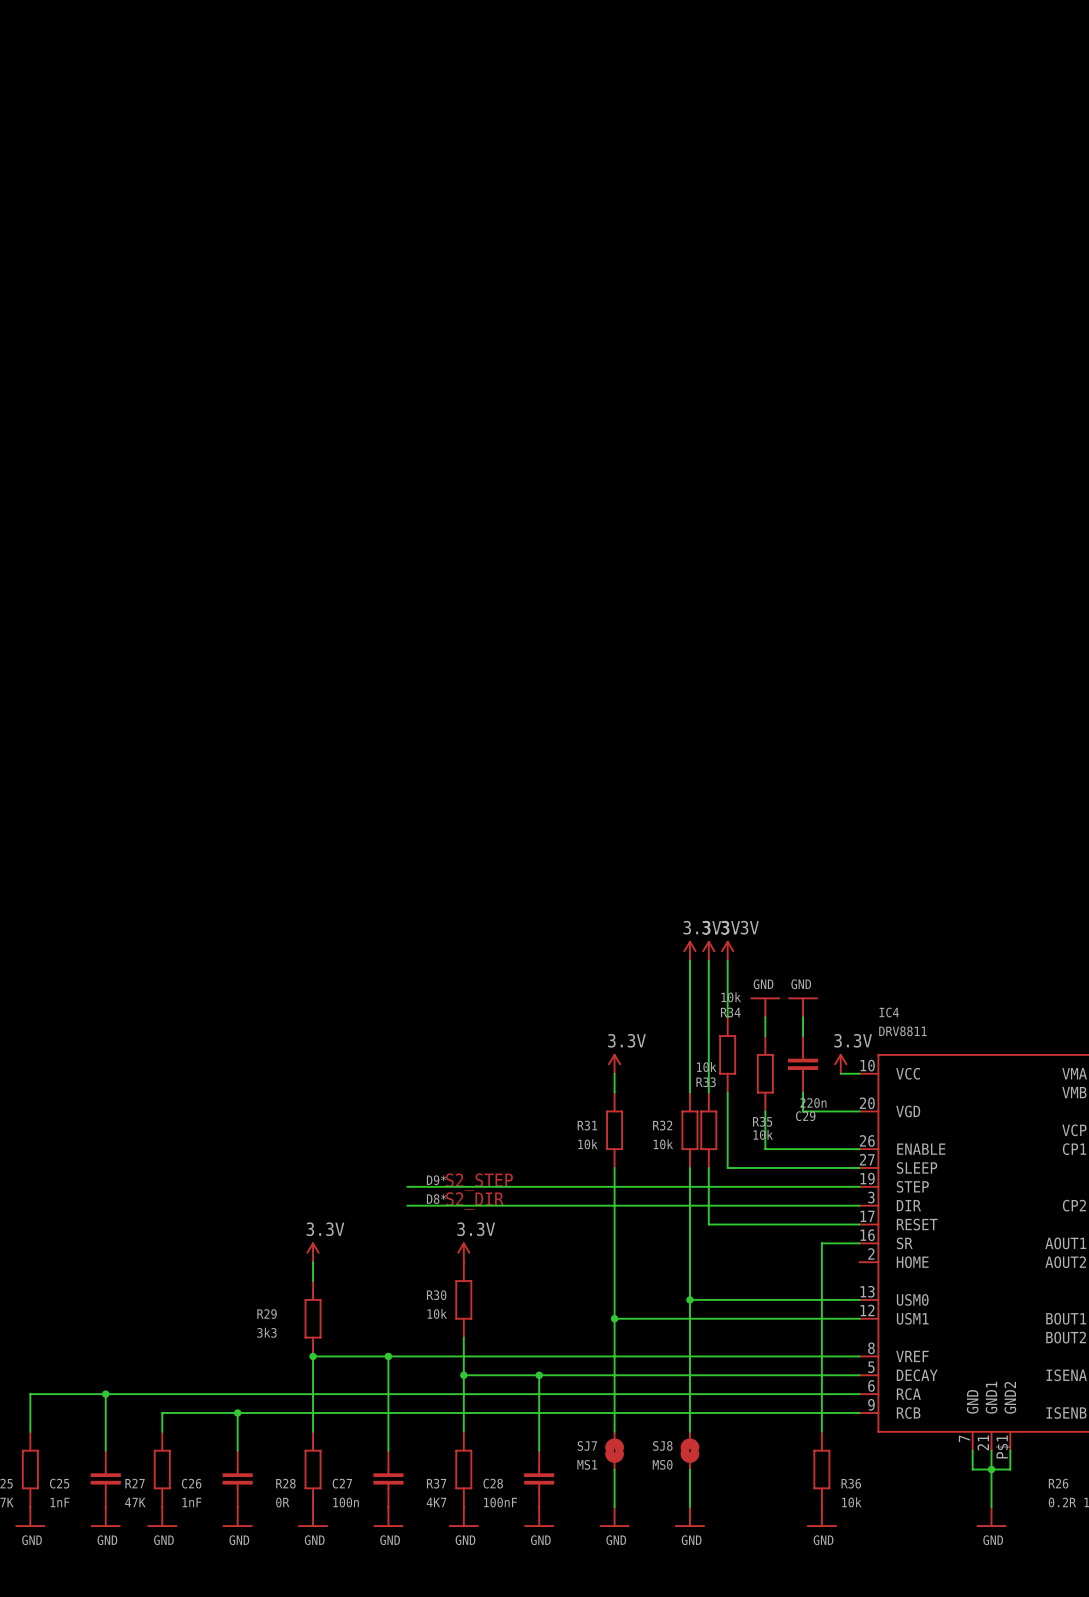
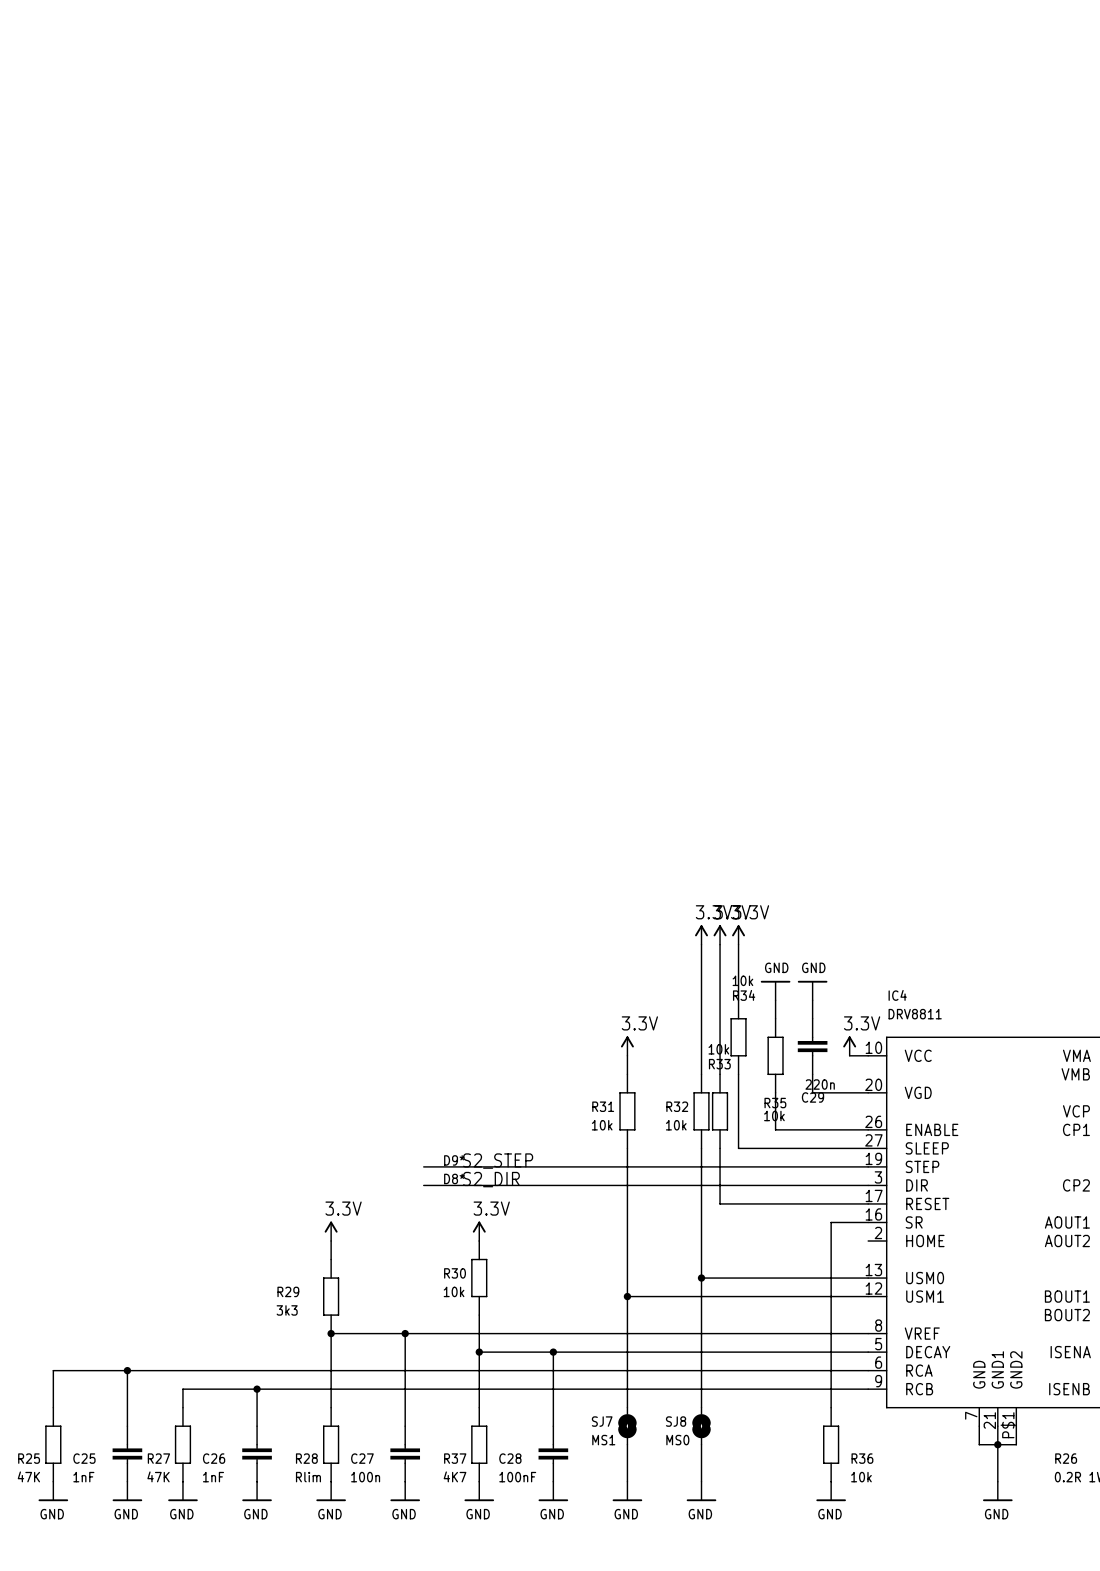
R28 value: 0R (282, 1502) -> Rlim (308, 1477)

